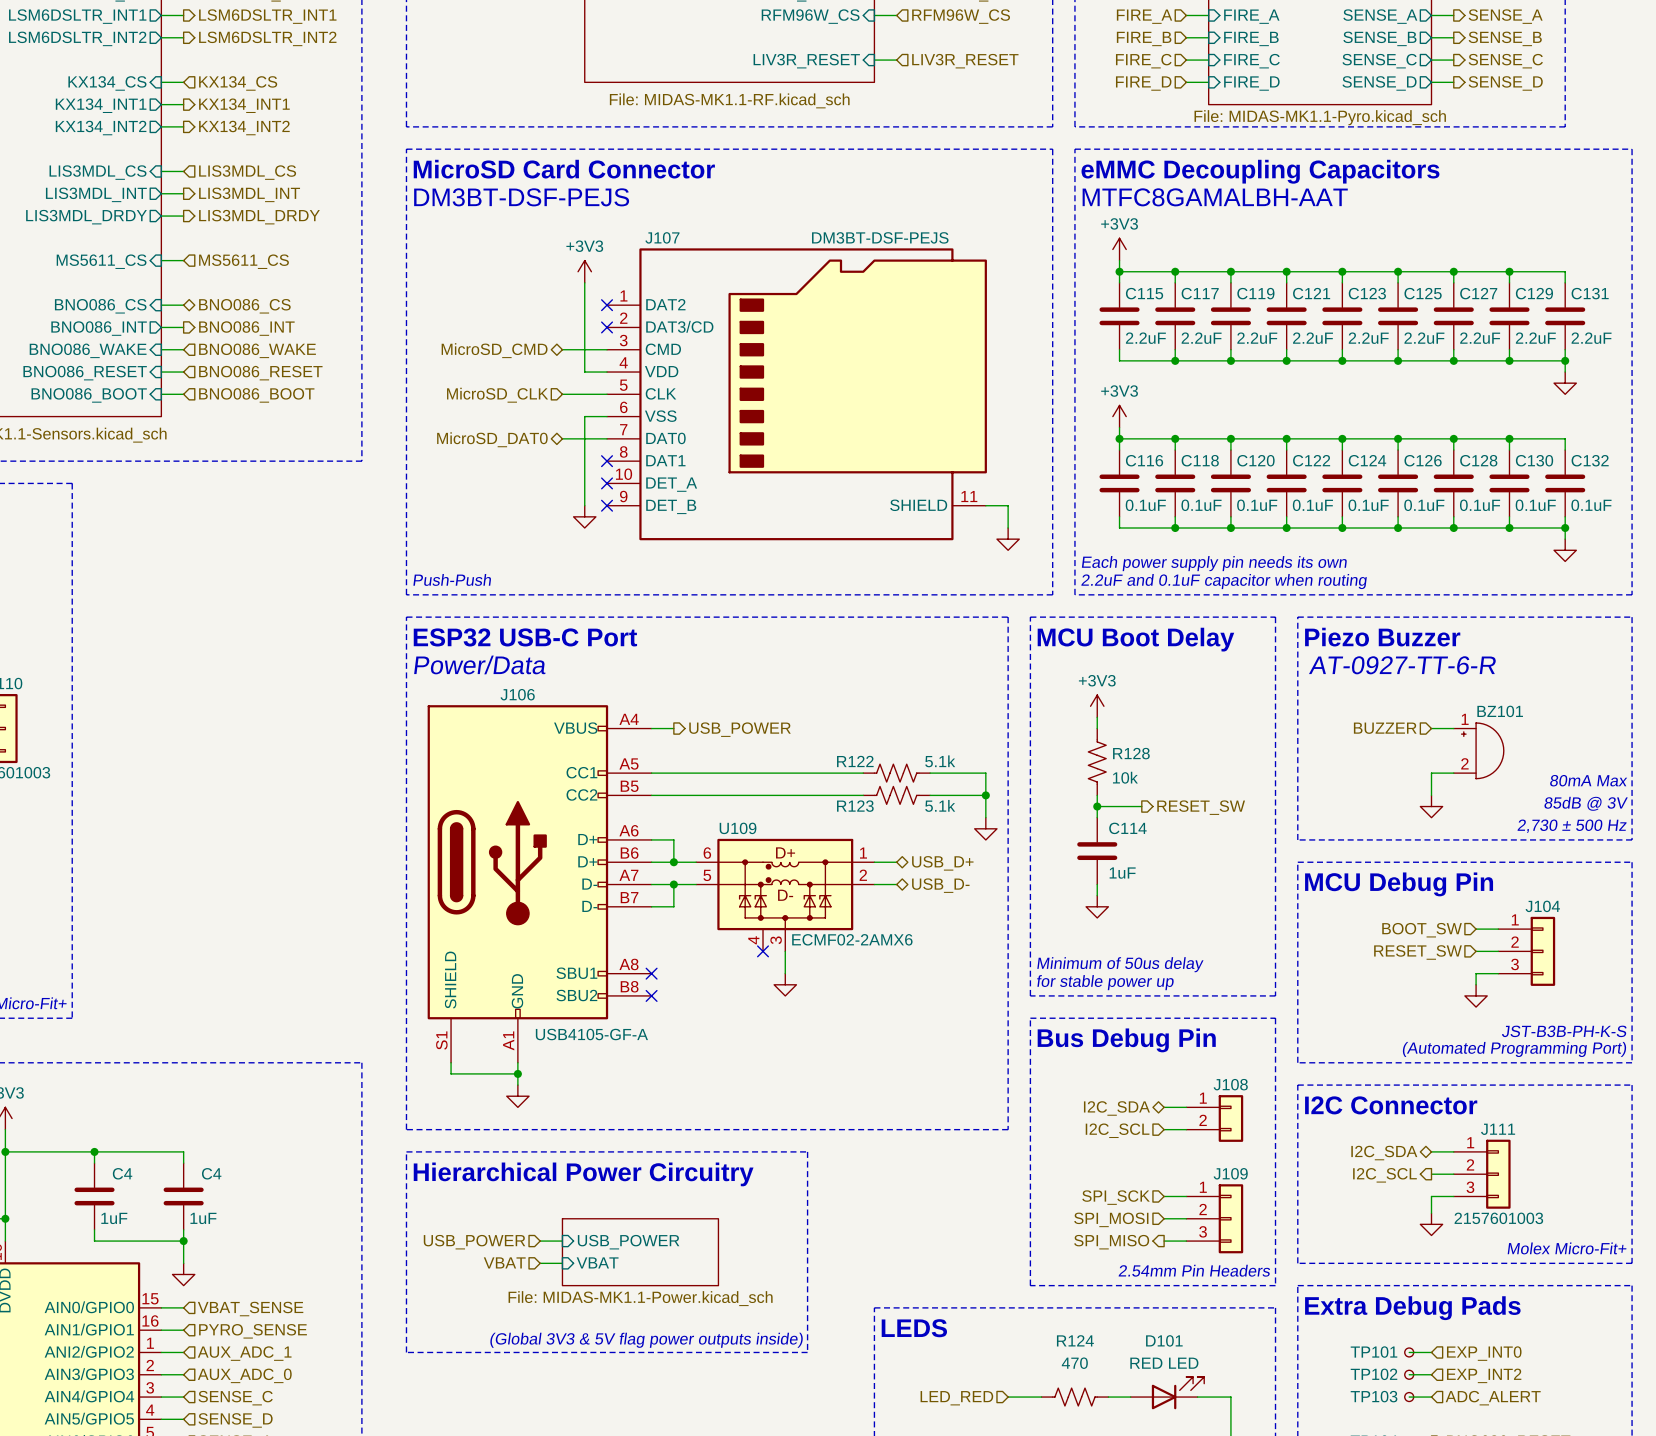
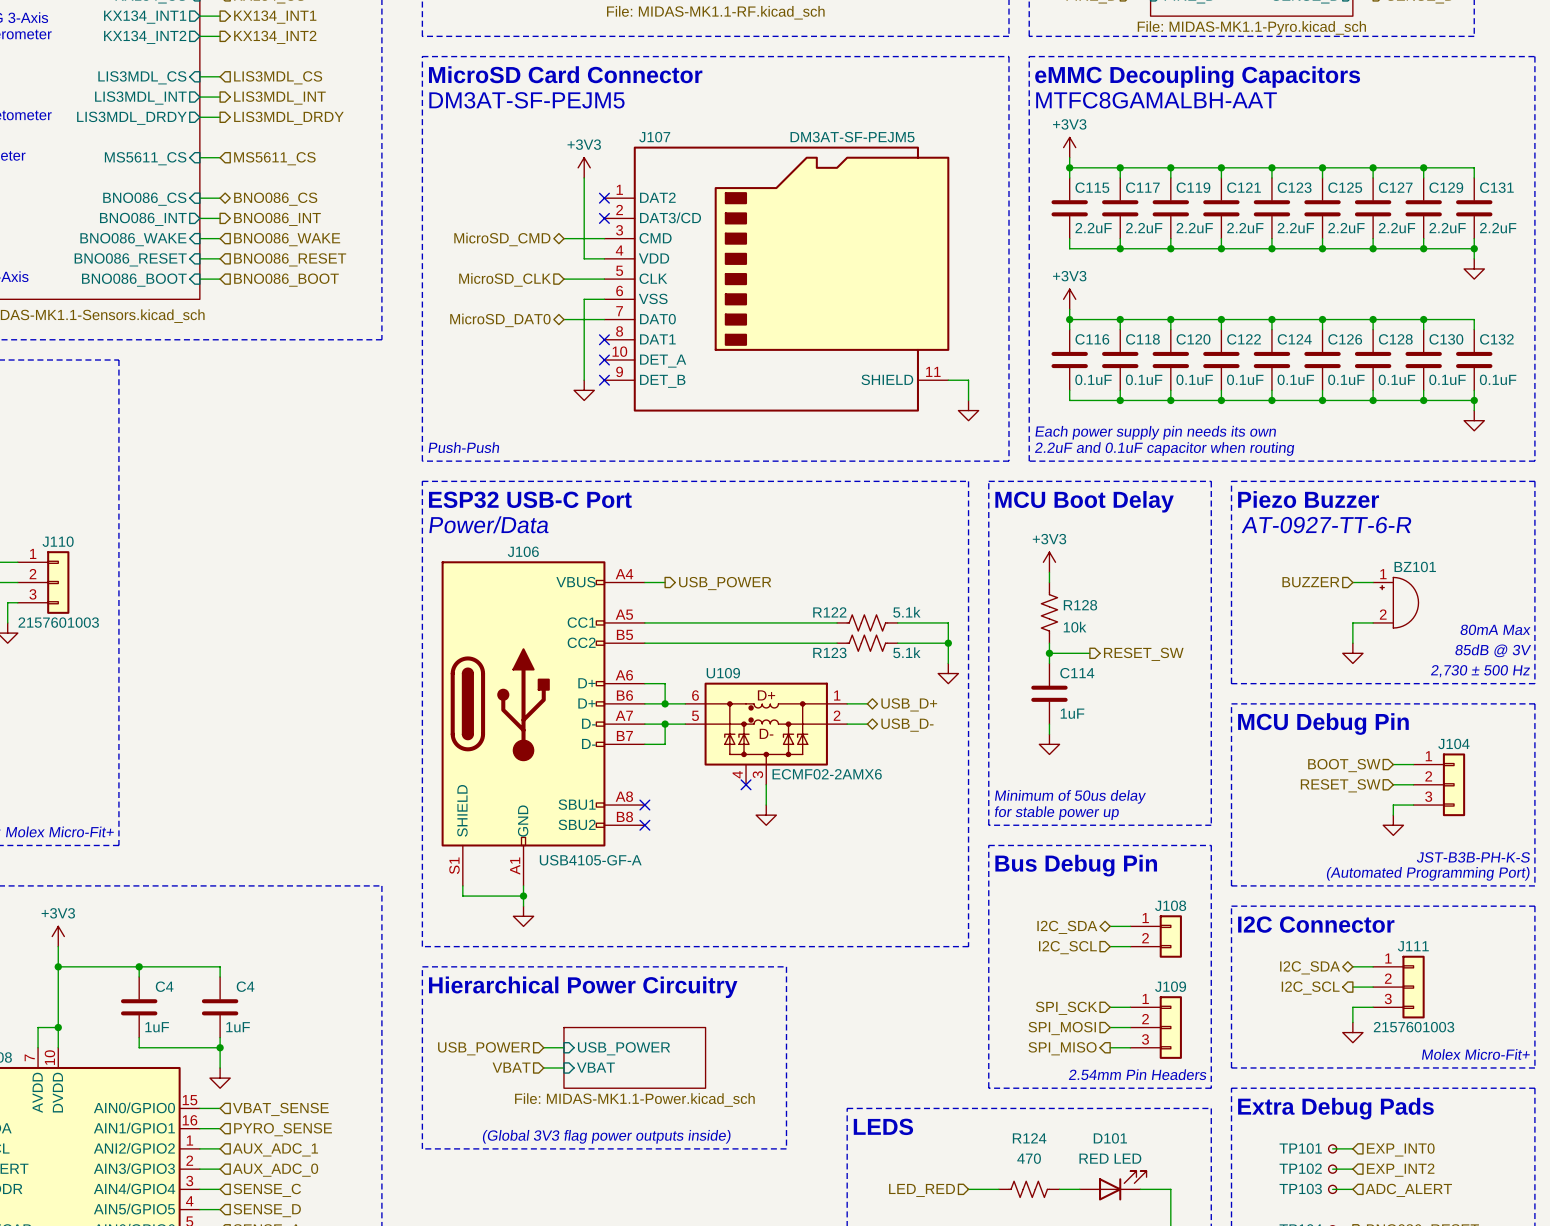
text: DM3BT-DSF-PEJS (521, 197) -> DM3AT-SF-PEJM5 (526, 100)
J107 value: DM3BT-DSF-PEJS (880, 237) -> DM3AT-SF-PEJM5 (852, 137)
text: (Global 3V3 & 5V flag power outputs inside) (646, 1340) -> (Global 3V3 flag power outputs inside) (606, 1136)

